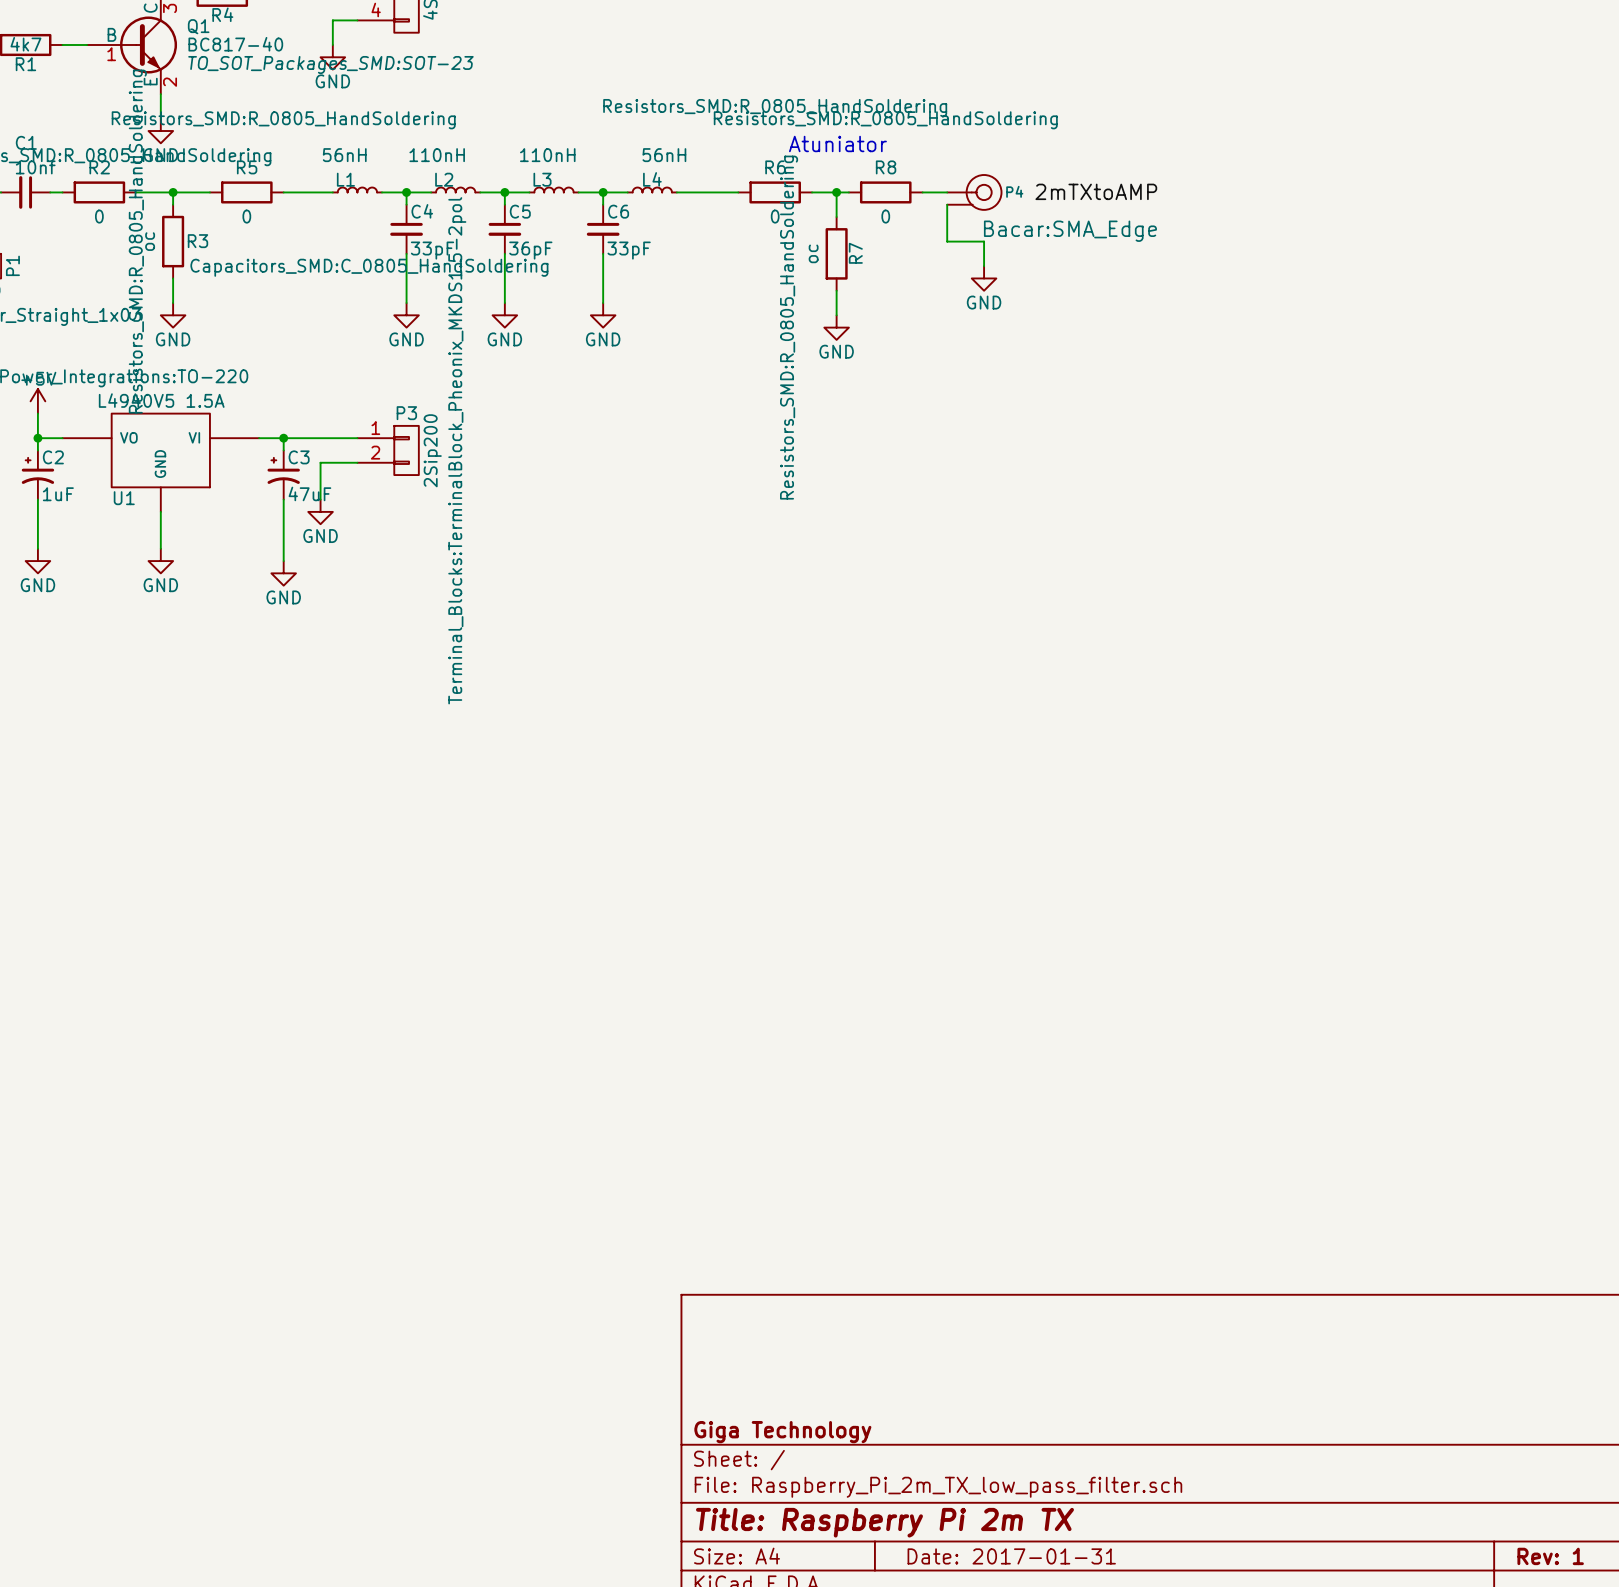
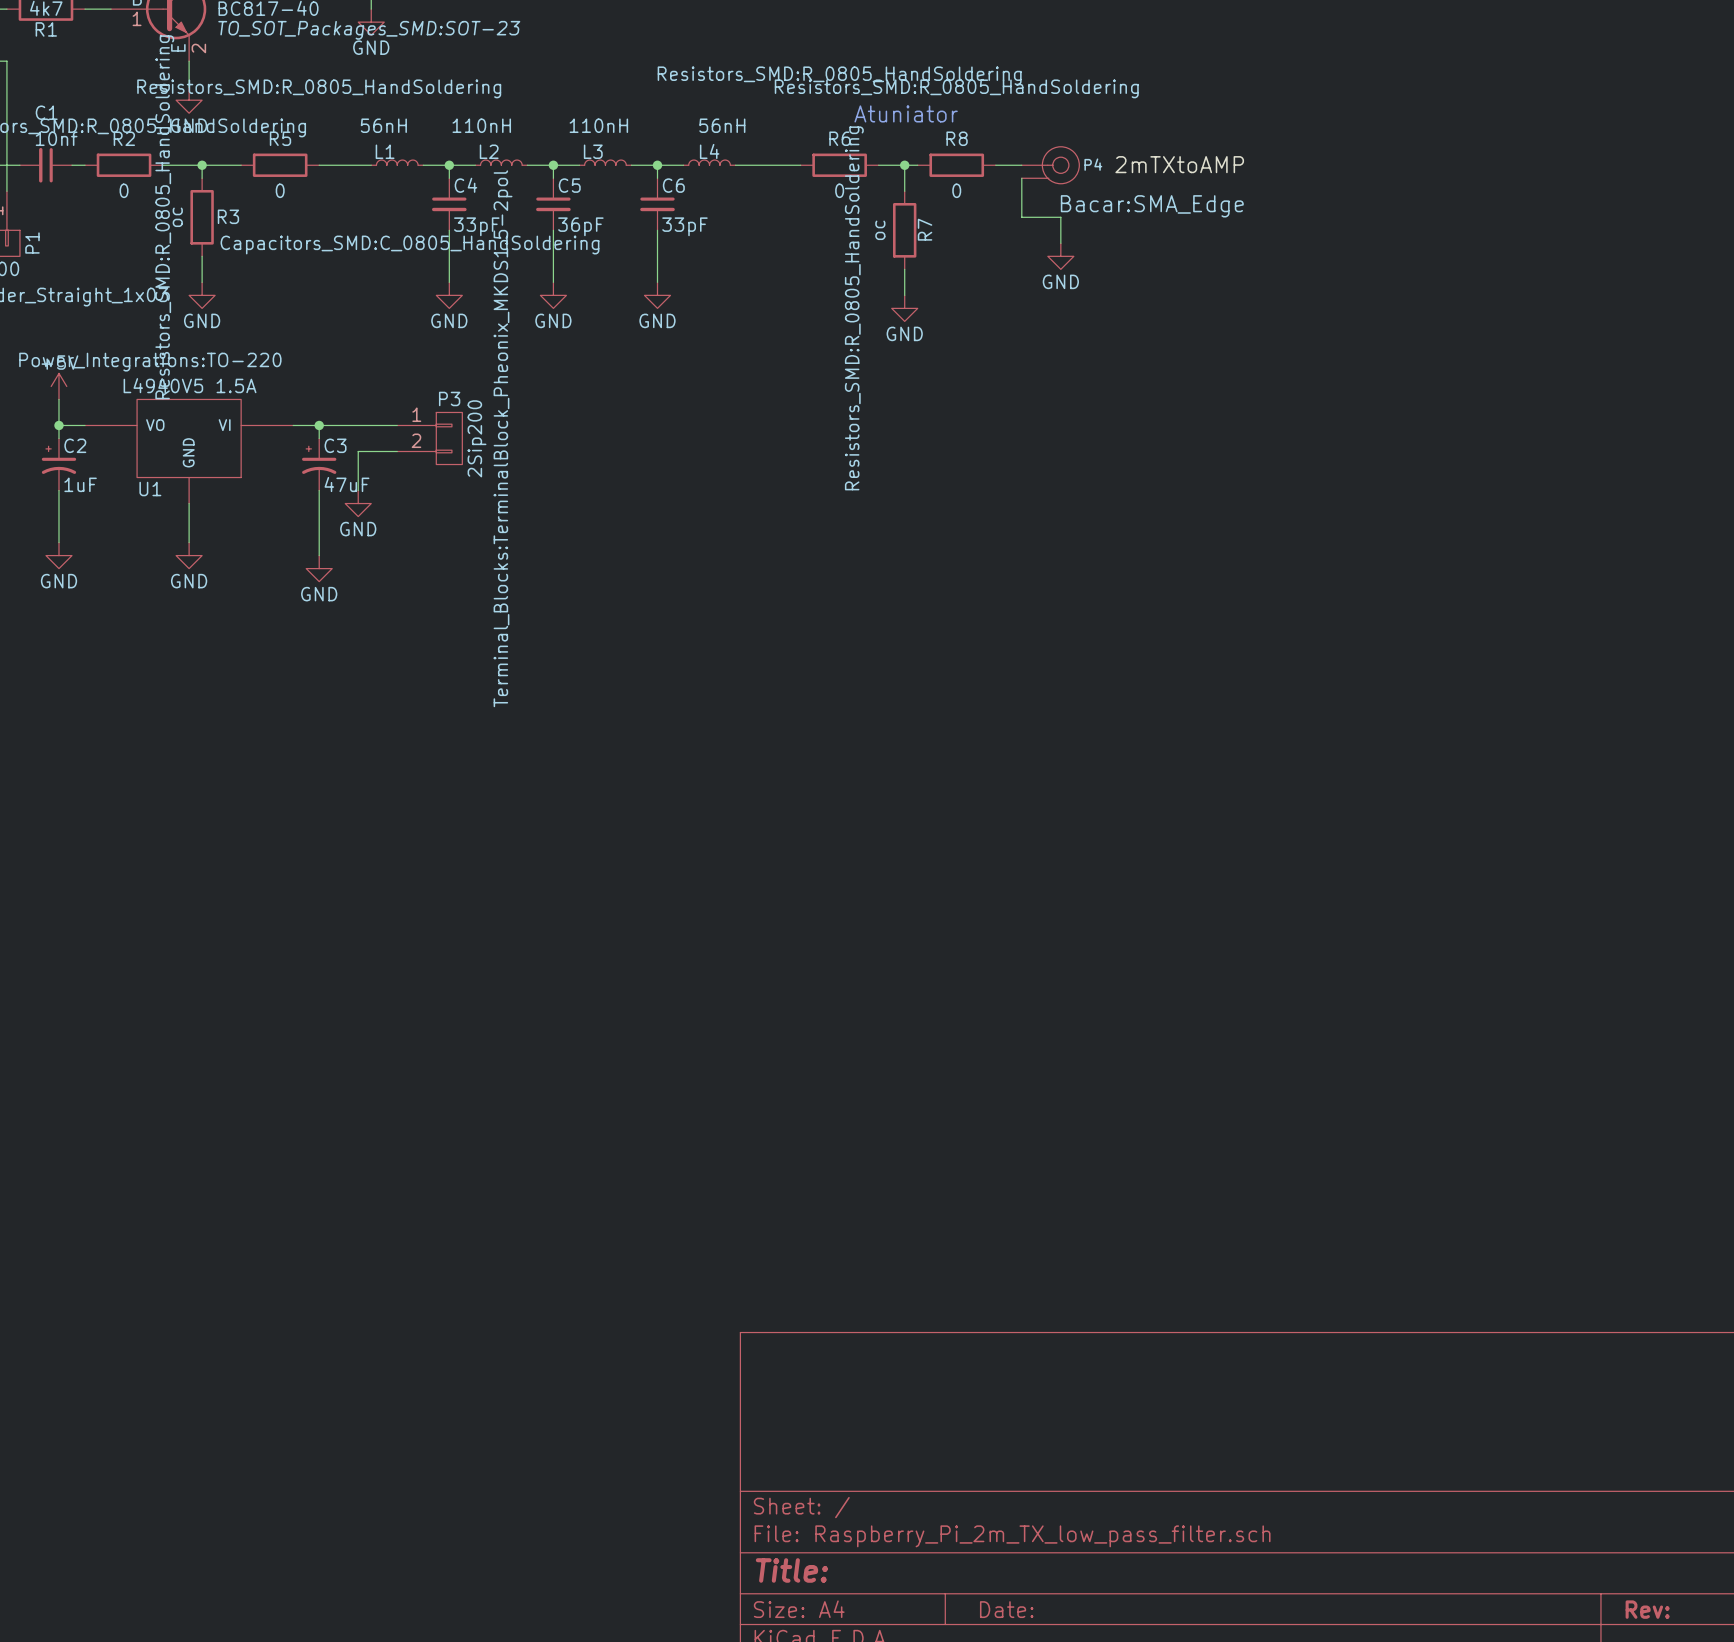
title block: Giga Technology (782, 1432) -> none
title block: Title: Raspberry Pi 2m TX (884, 1522) -> Title: (791, 1570)
title block: Date: 2017-01-31 (1011, 1556) -> Date: (1006, 1609)
title block: Rev: 1 (1550, 1556) -> Rev: (1647, 1609)

